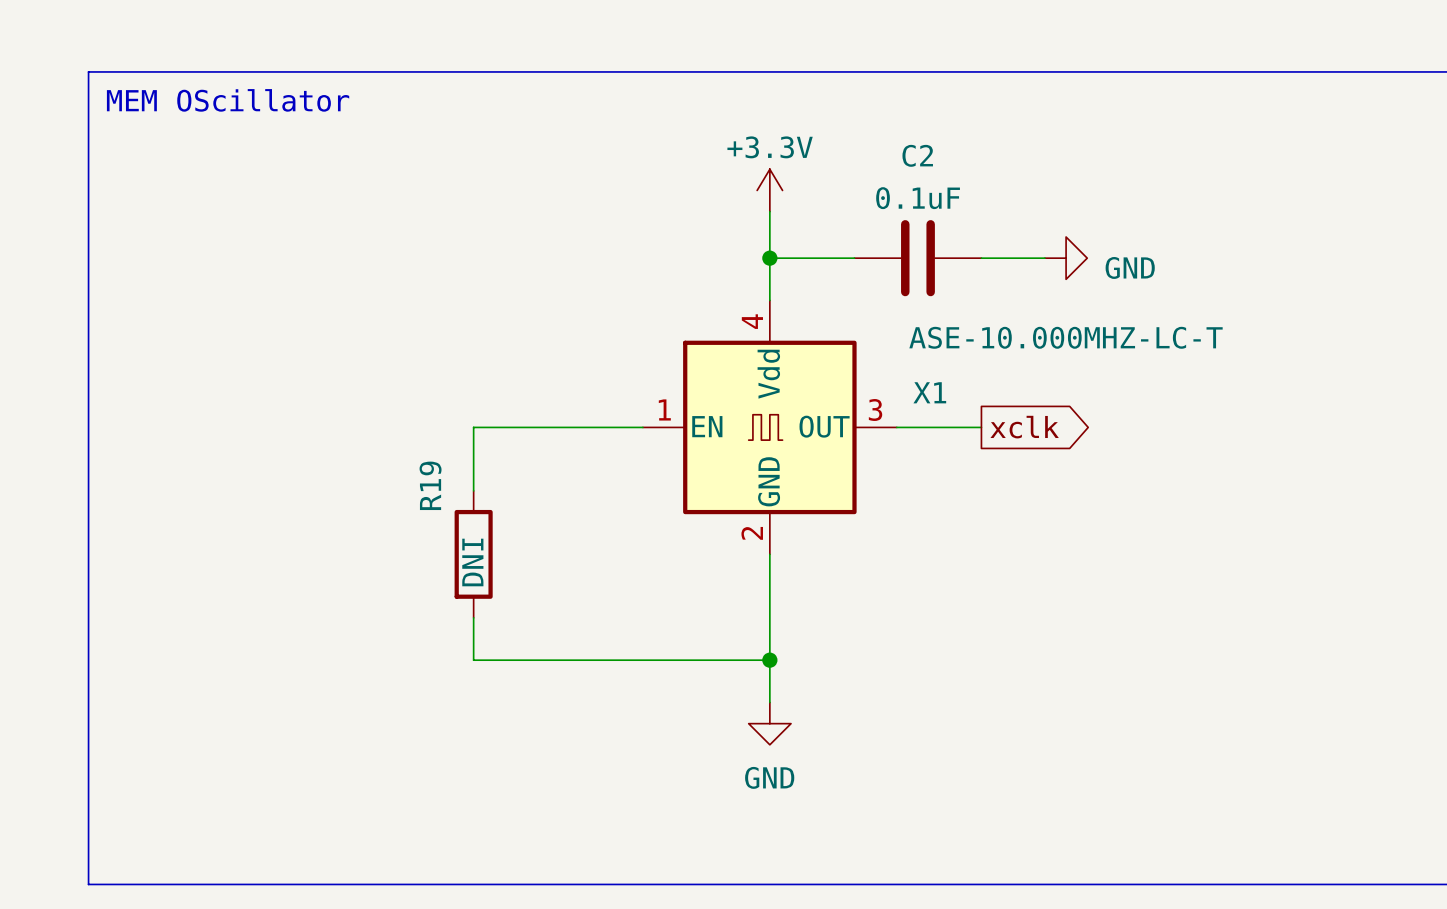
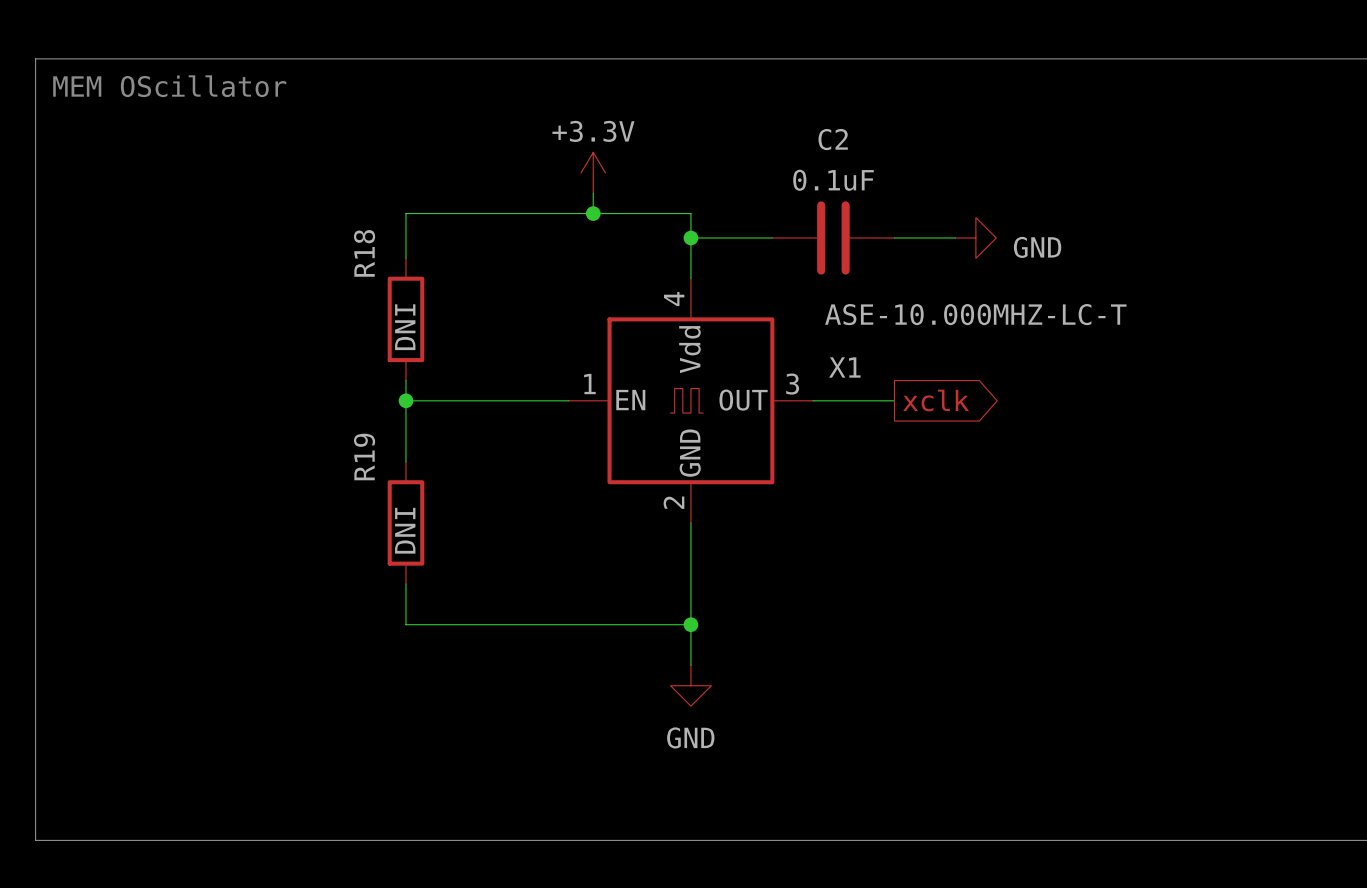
power symbol position: +3.3V (769, 190) -> +3.3V (593, 172)
wire: none -> (593, 193) (593, 213)
wire: (769, 211) (769, 232) -> (406, 258) (406, 213) (690, 213)
junction: none -> (593, 213)
R18: none -> DNI (406, 319)
wire: none -> (406, 380) (406, 400)
junction: none -> (406, 400)

